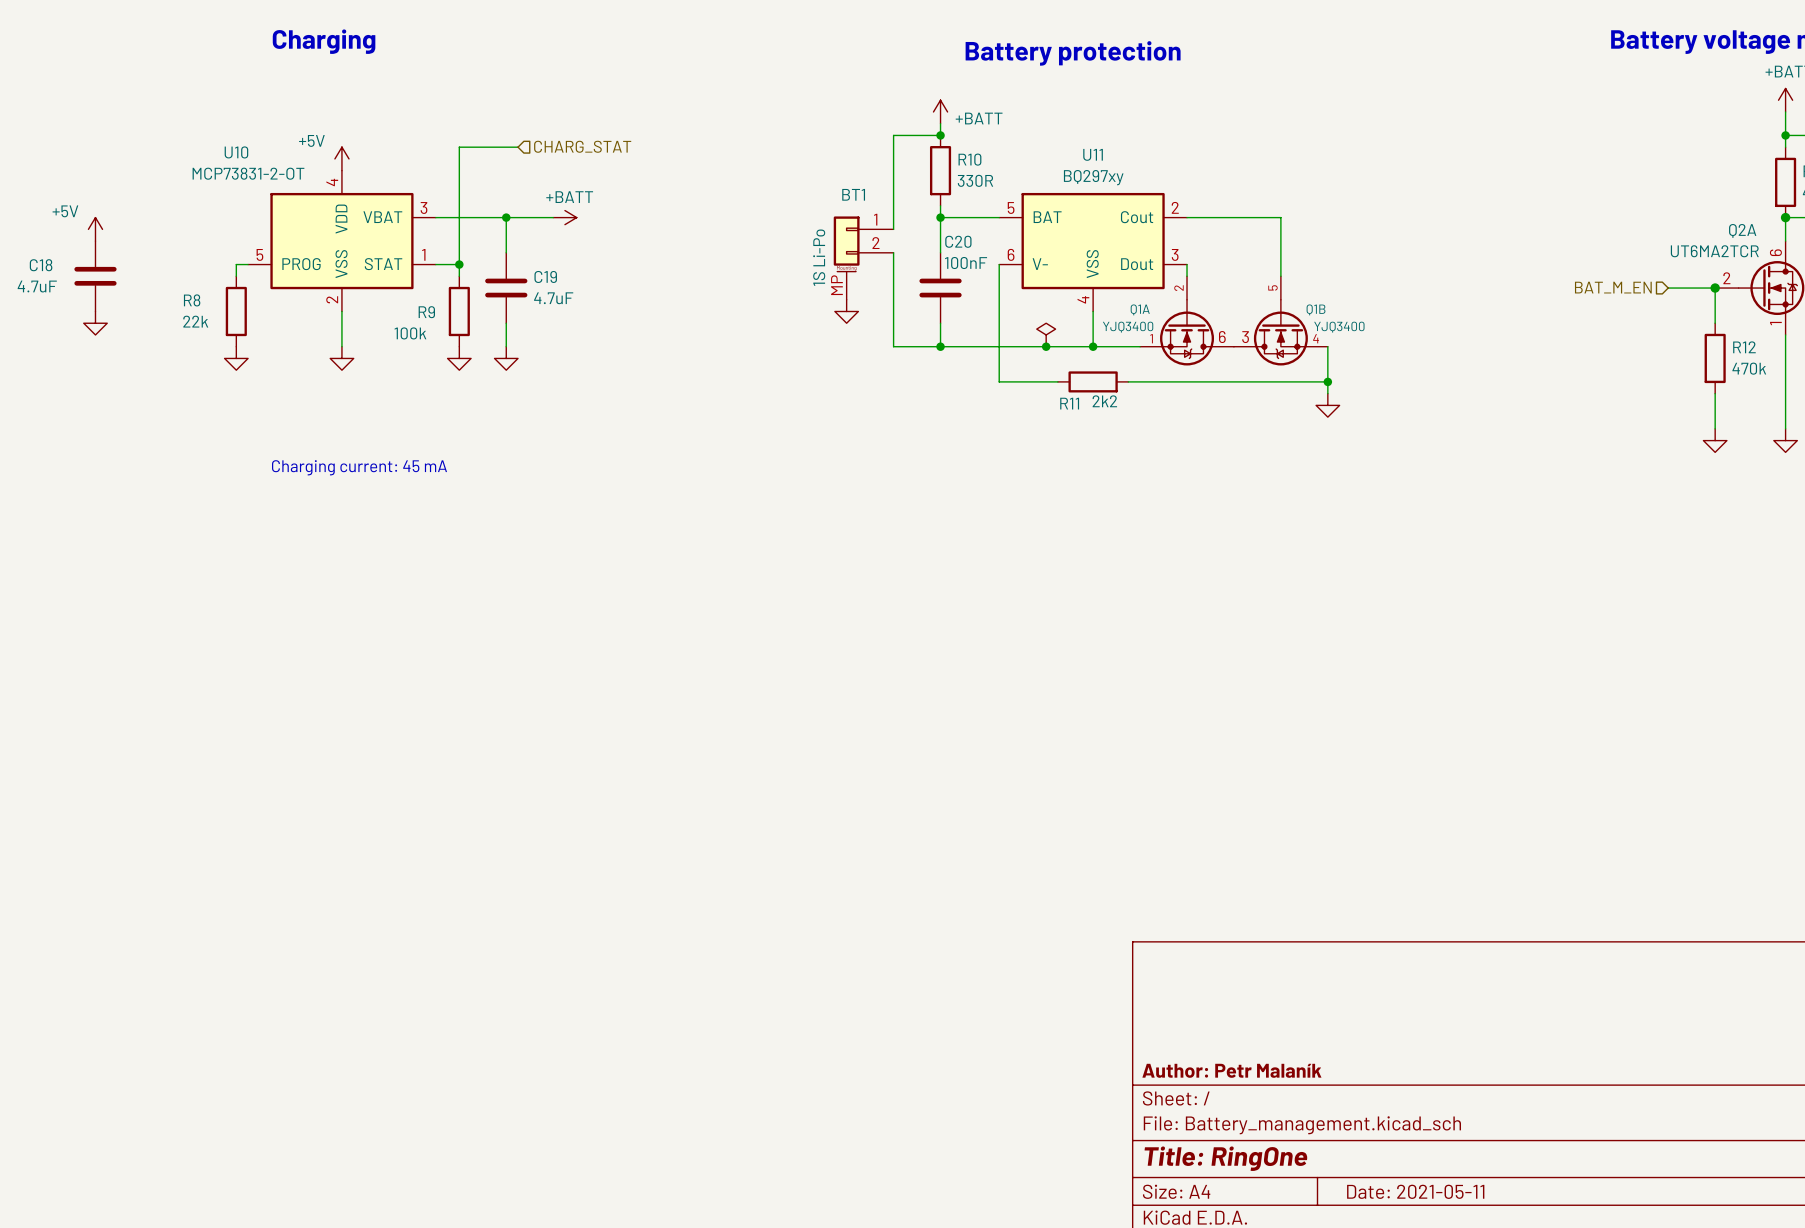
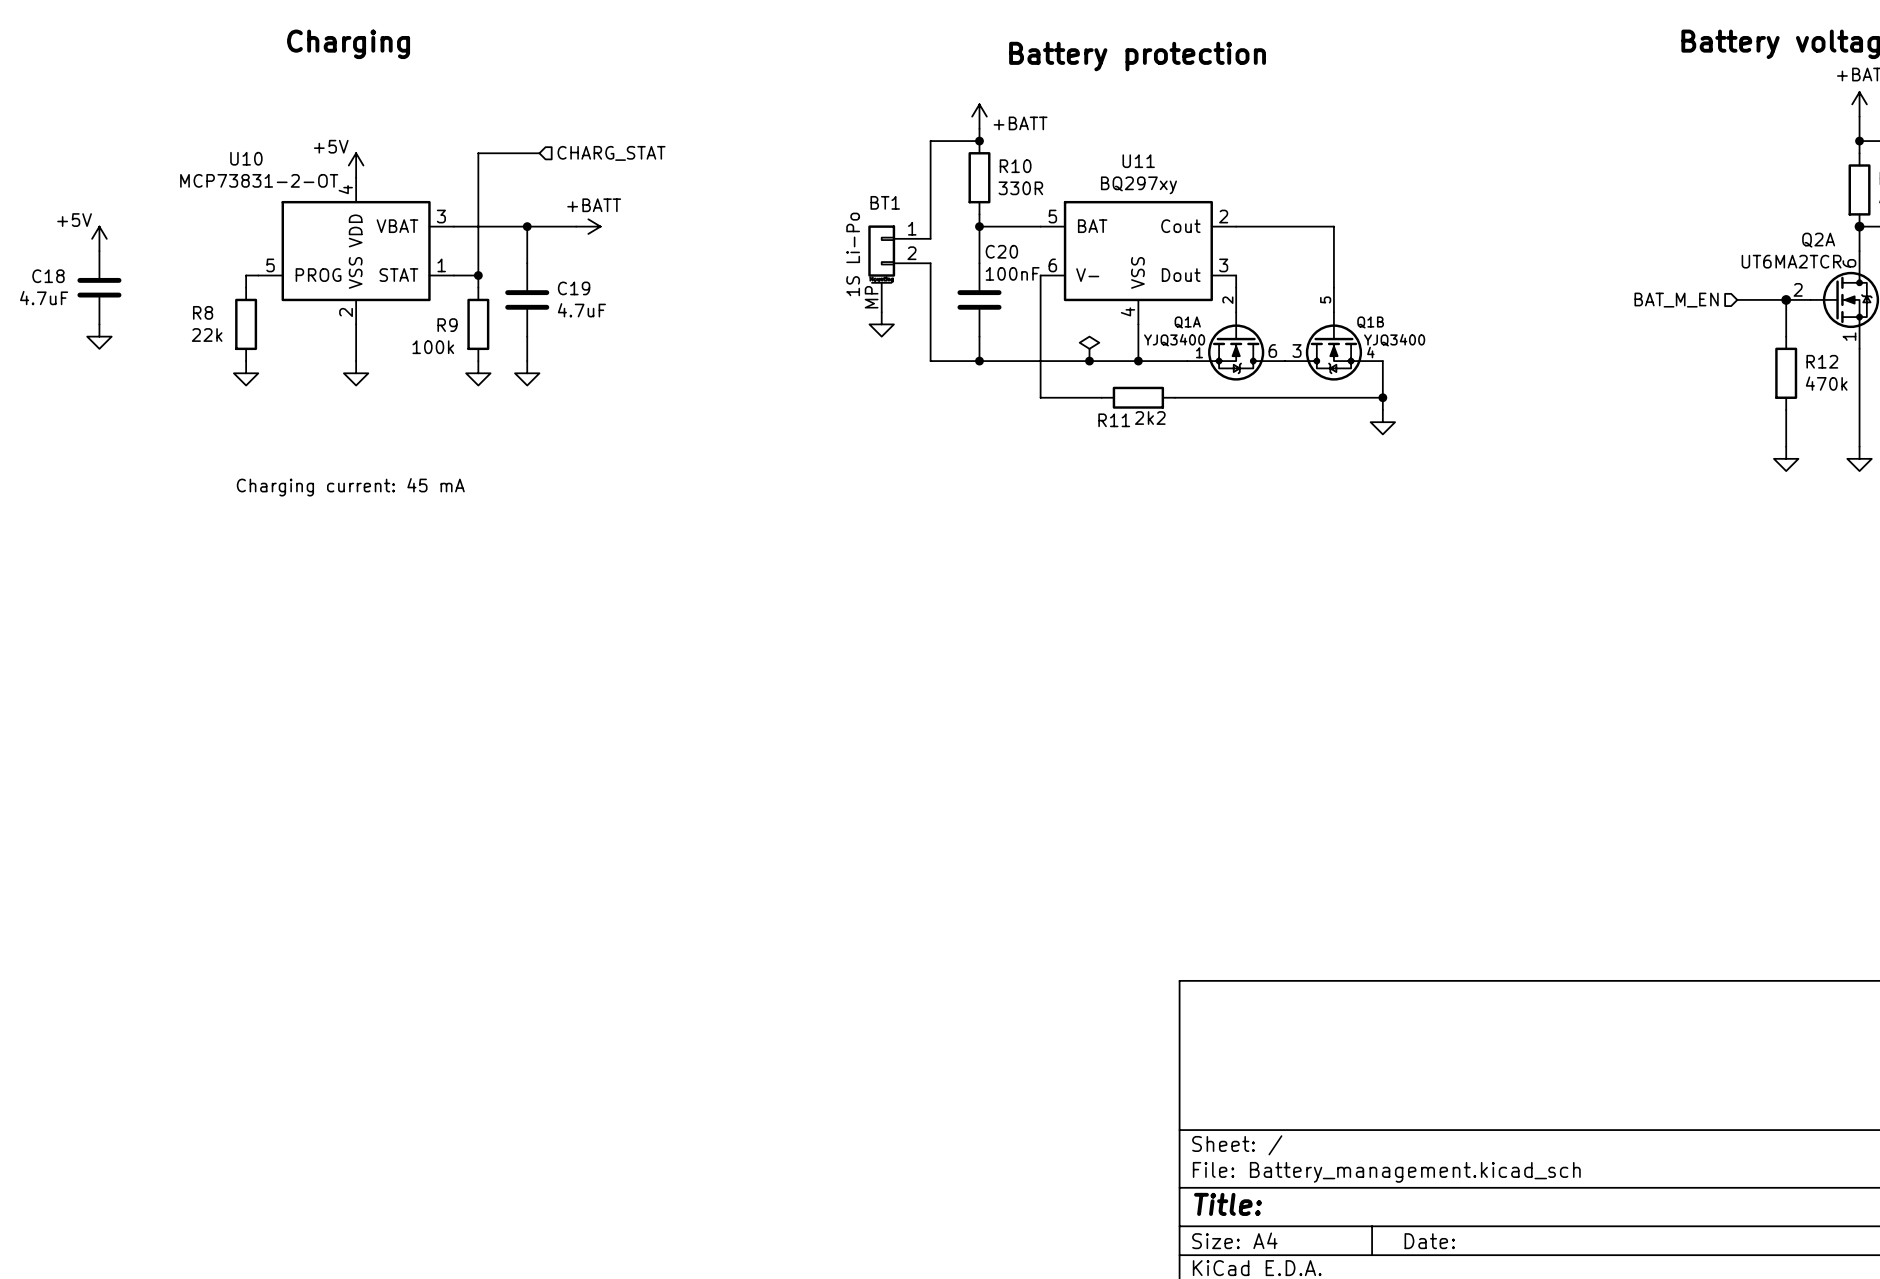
title block: Author: Petr Malaník (1231, 1070) -> none
title block: Title: RingOne (1225, 1158) -> Title: (1228, 1204)
title block: Date: 2021-05-11 (1415, 1191) -> Date: (1429, 1241)

